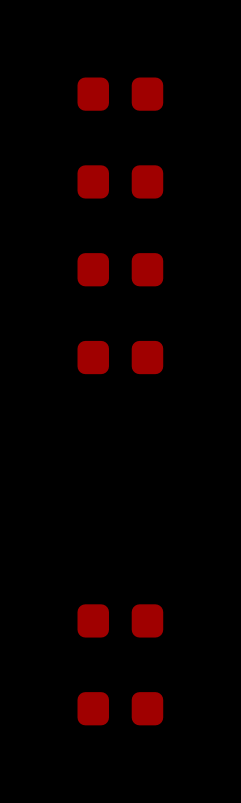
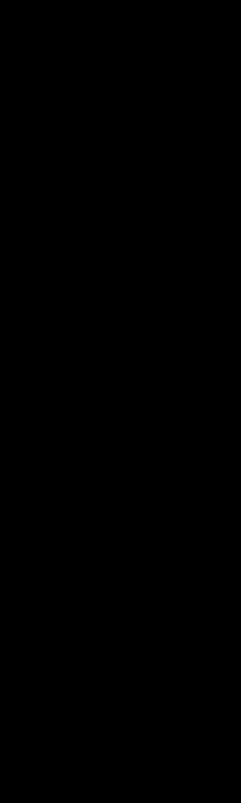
part: (120, 94) -> none
part: (120, 181) -> none
part: (120, 269) -> none
part: (120, 357) -> none
part: (120, 620) -> none
part: (120, 708) -> none

